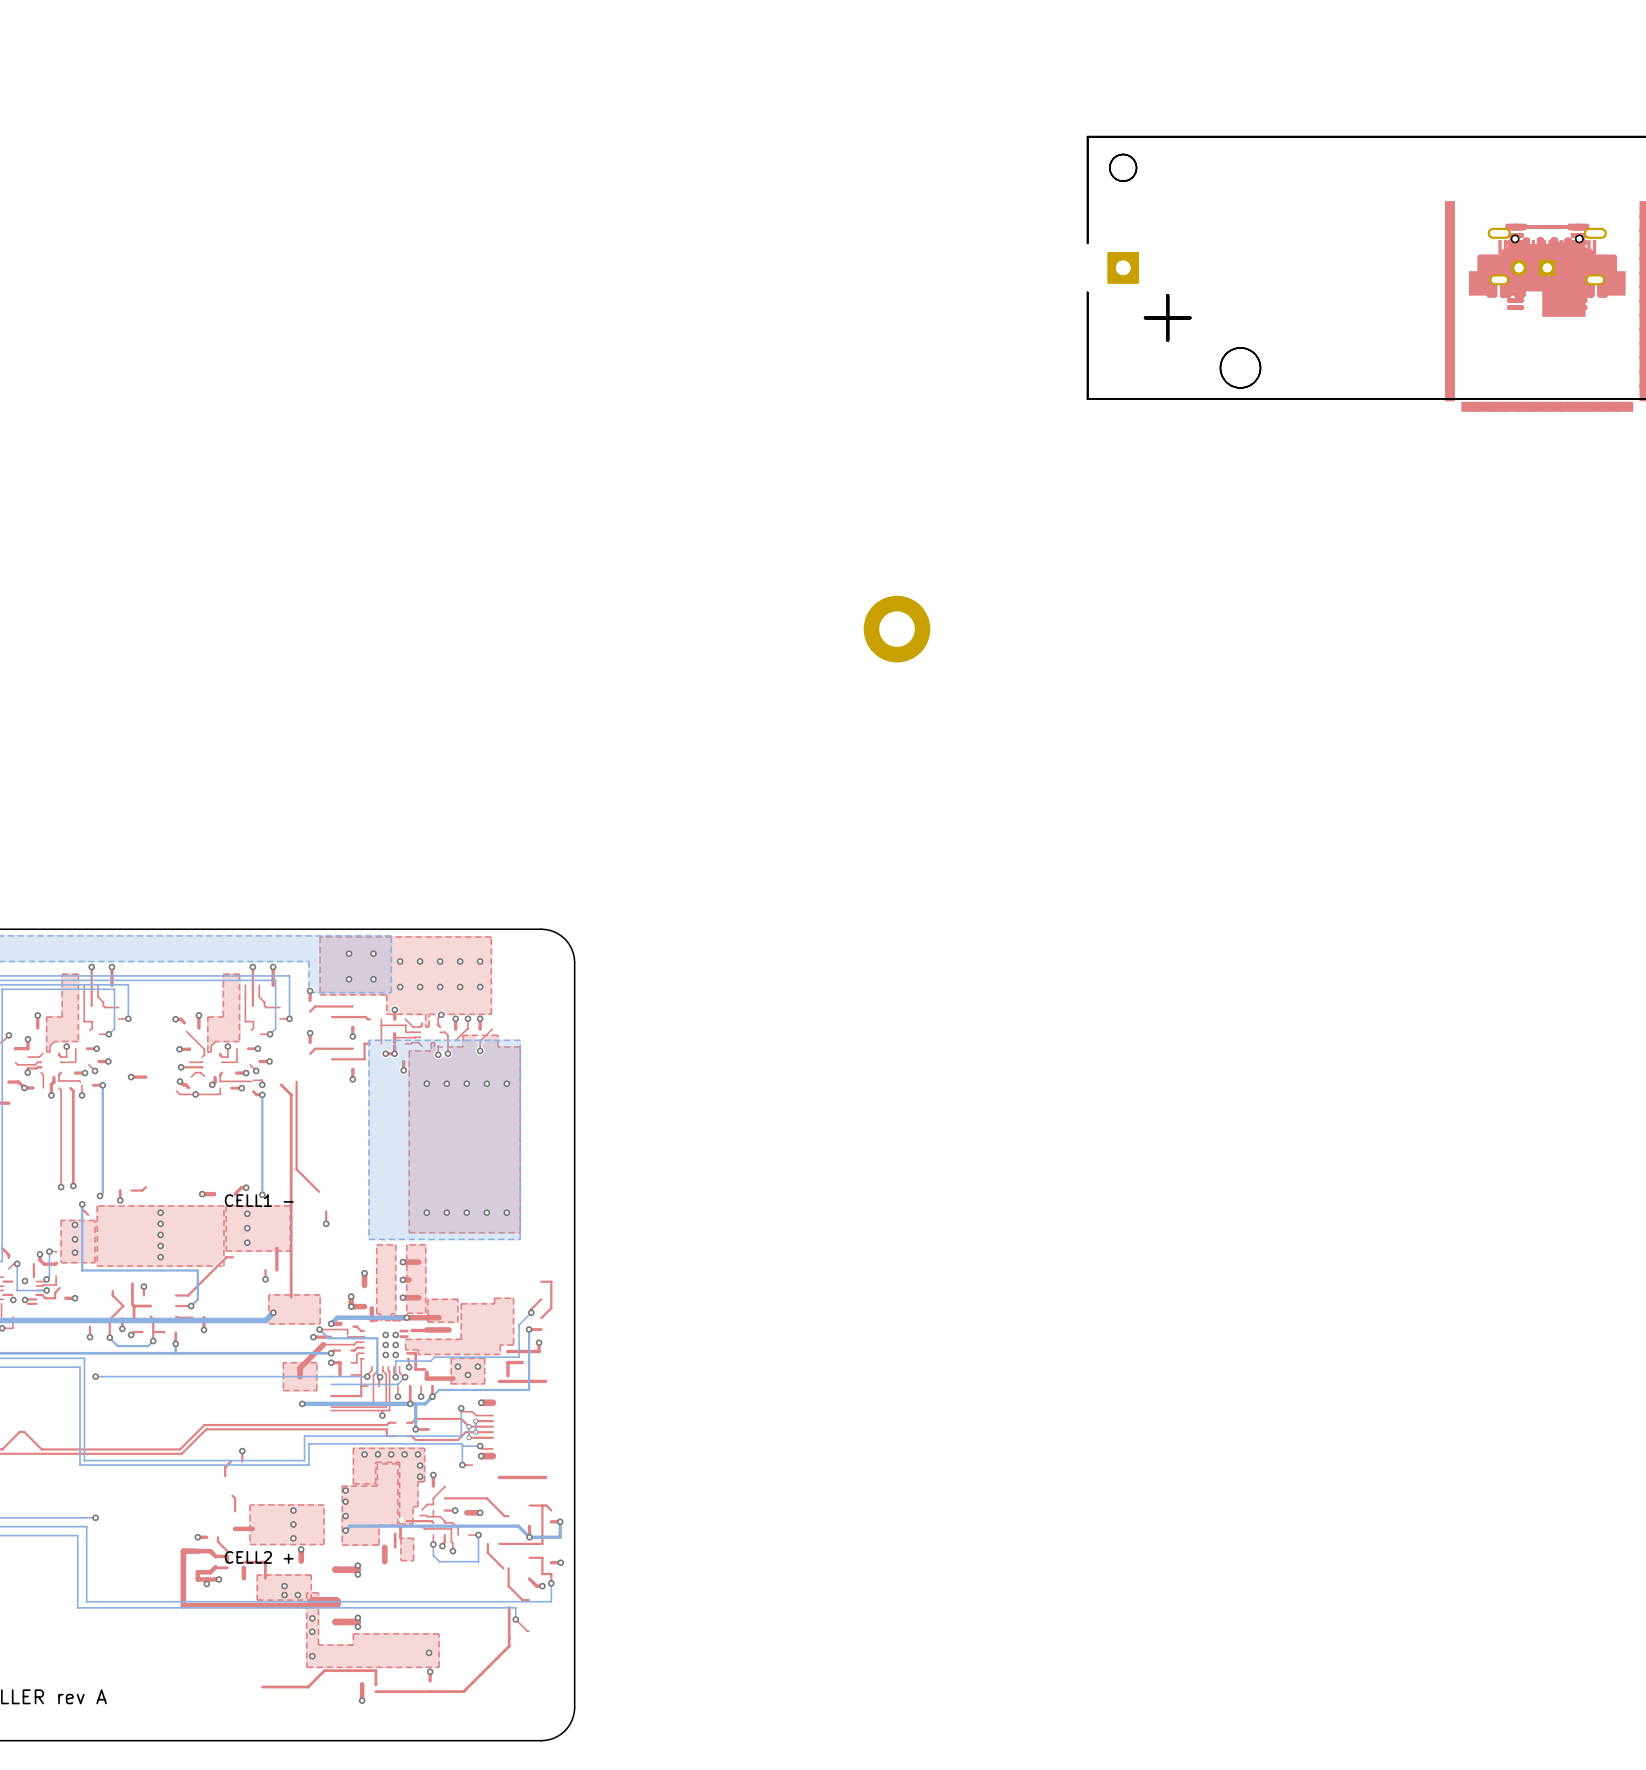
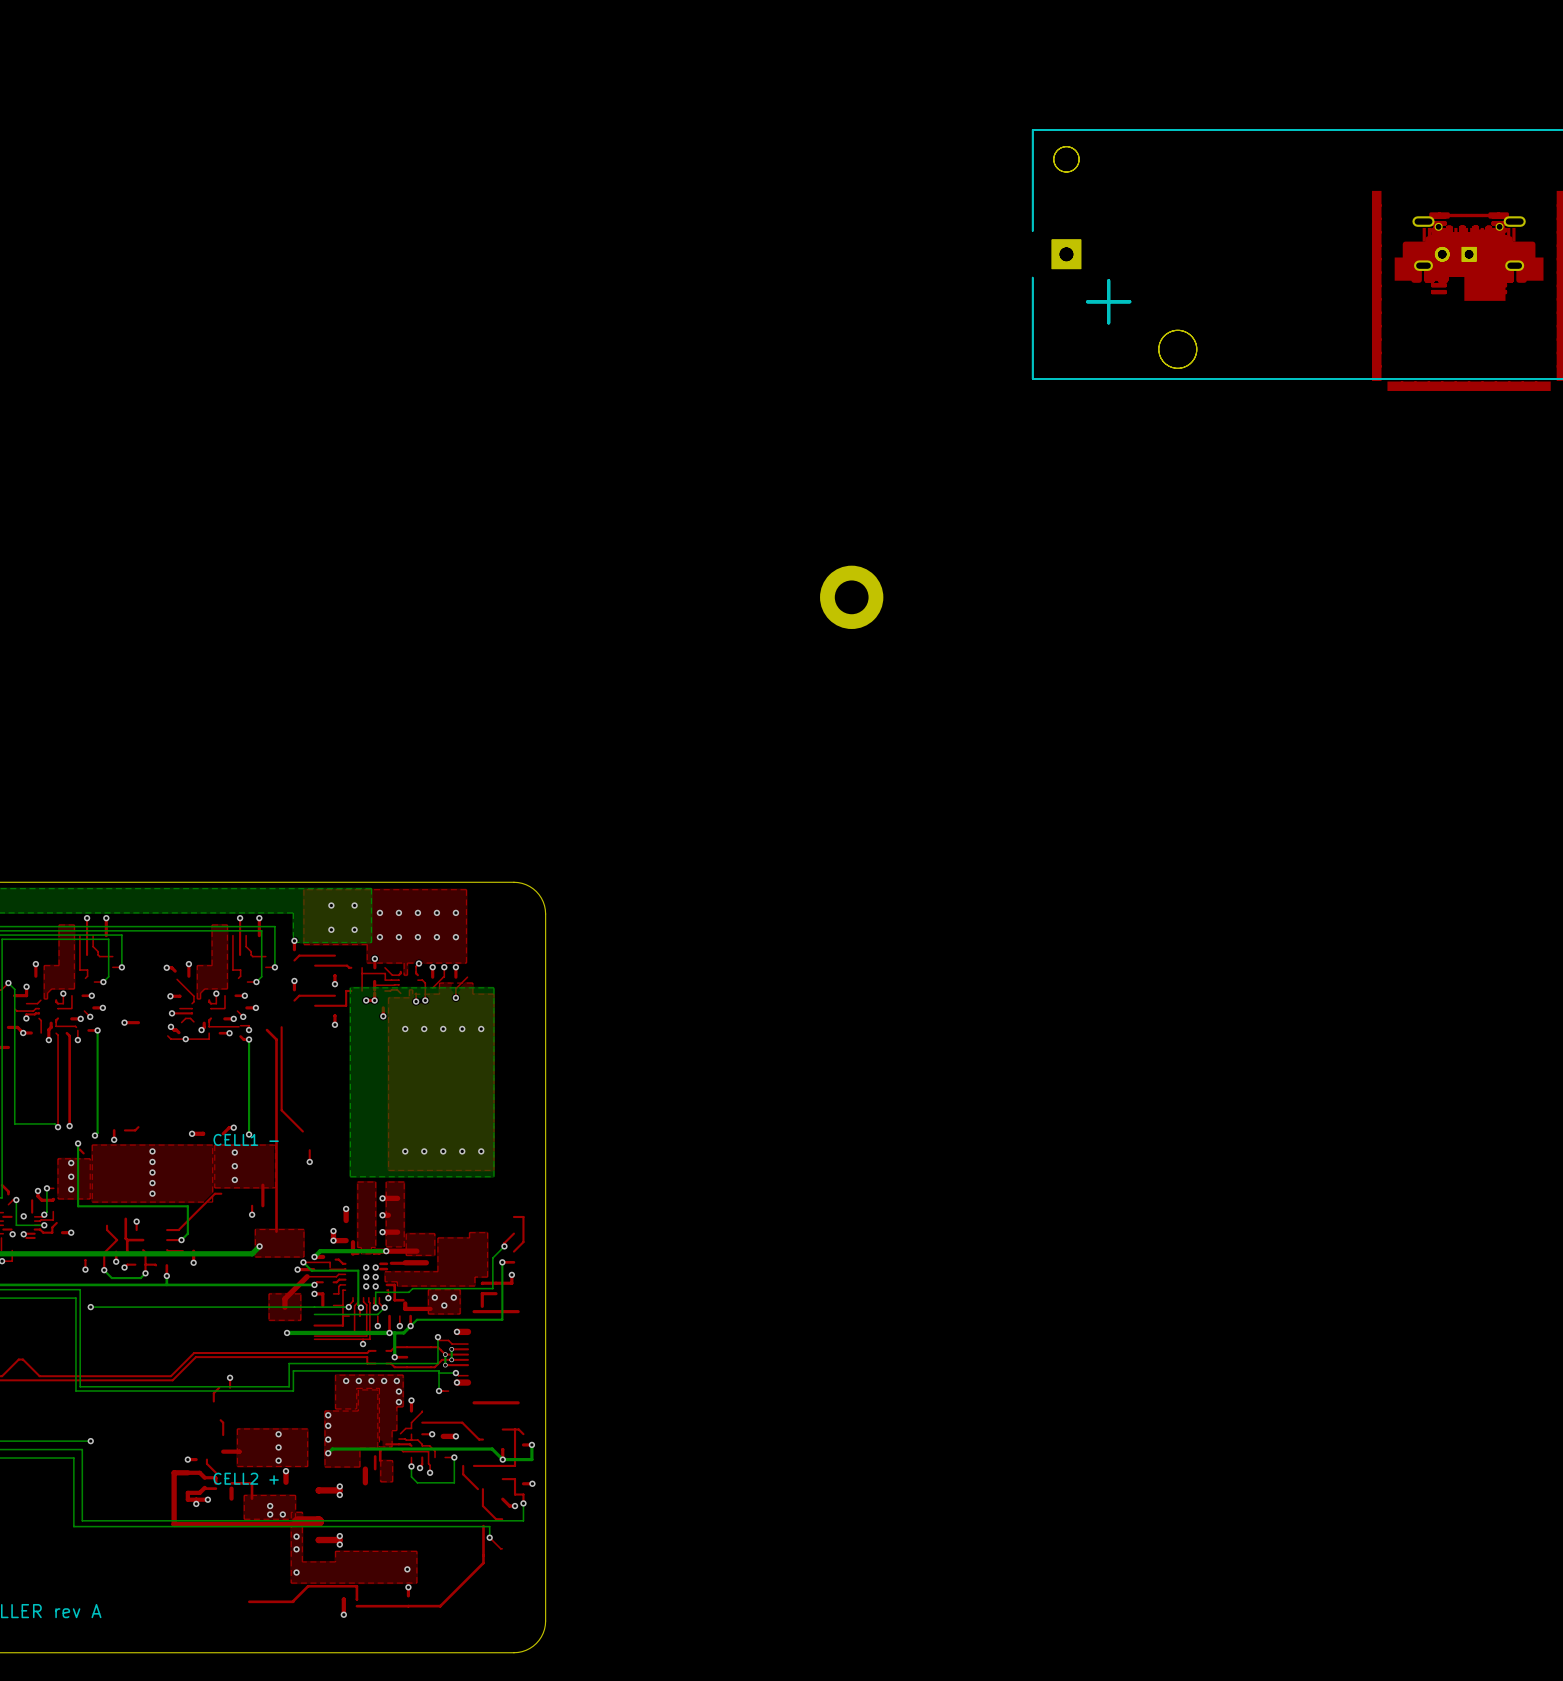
bottom track: none -> (8, 983) (14, 989) (14, 1123) (54, 1123) (58, 1127)

